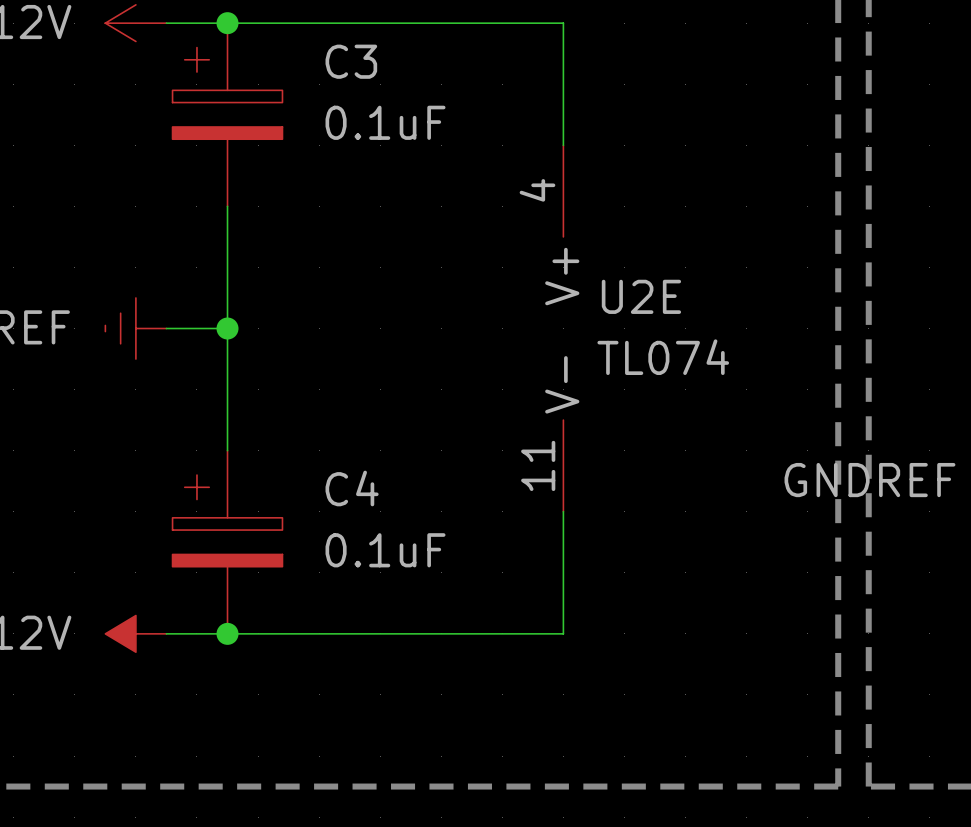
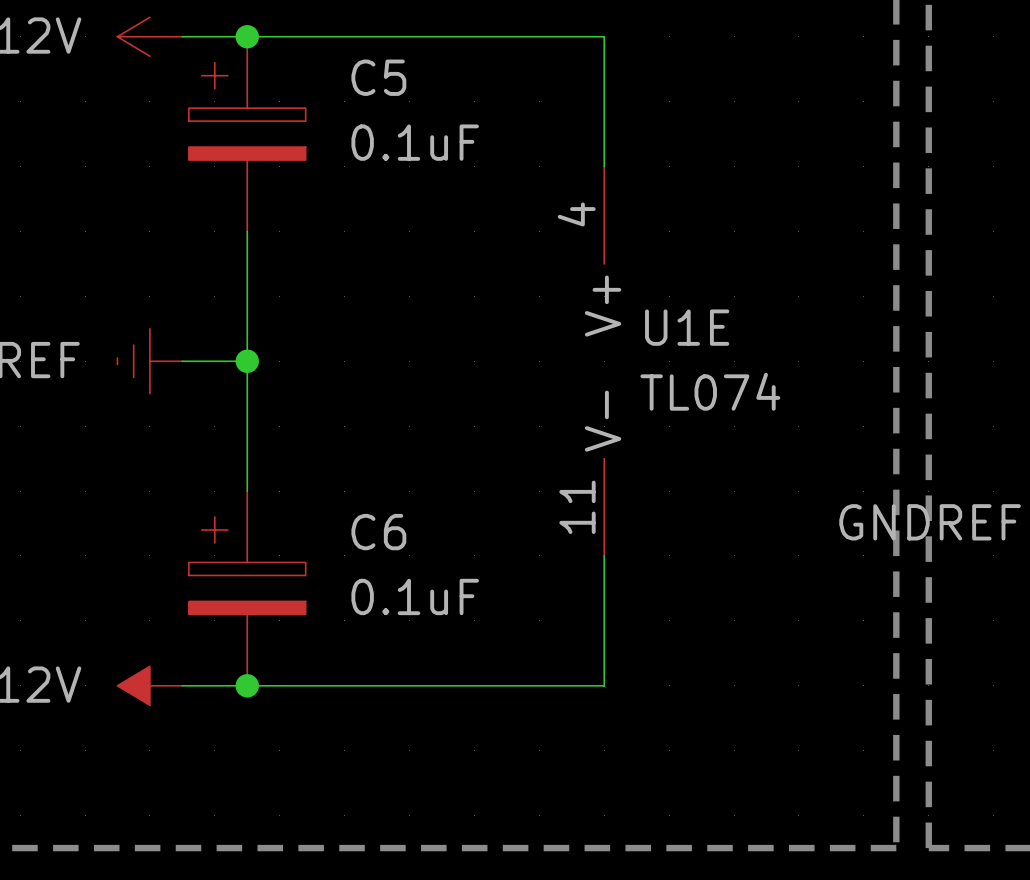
C3 name: C3 (351, 61) -> C5 (378, 77)
U2E name: U2E (641, 296) -> U1E (687, 327)
C4 name: C4 (352, 488) -> C6 (378, 532)

